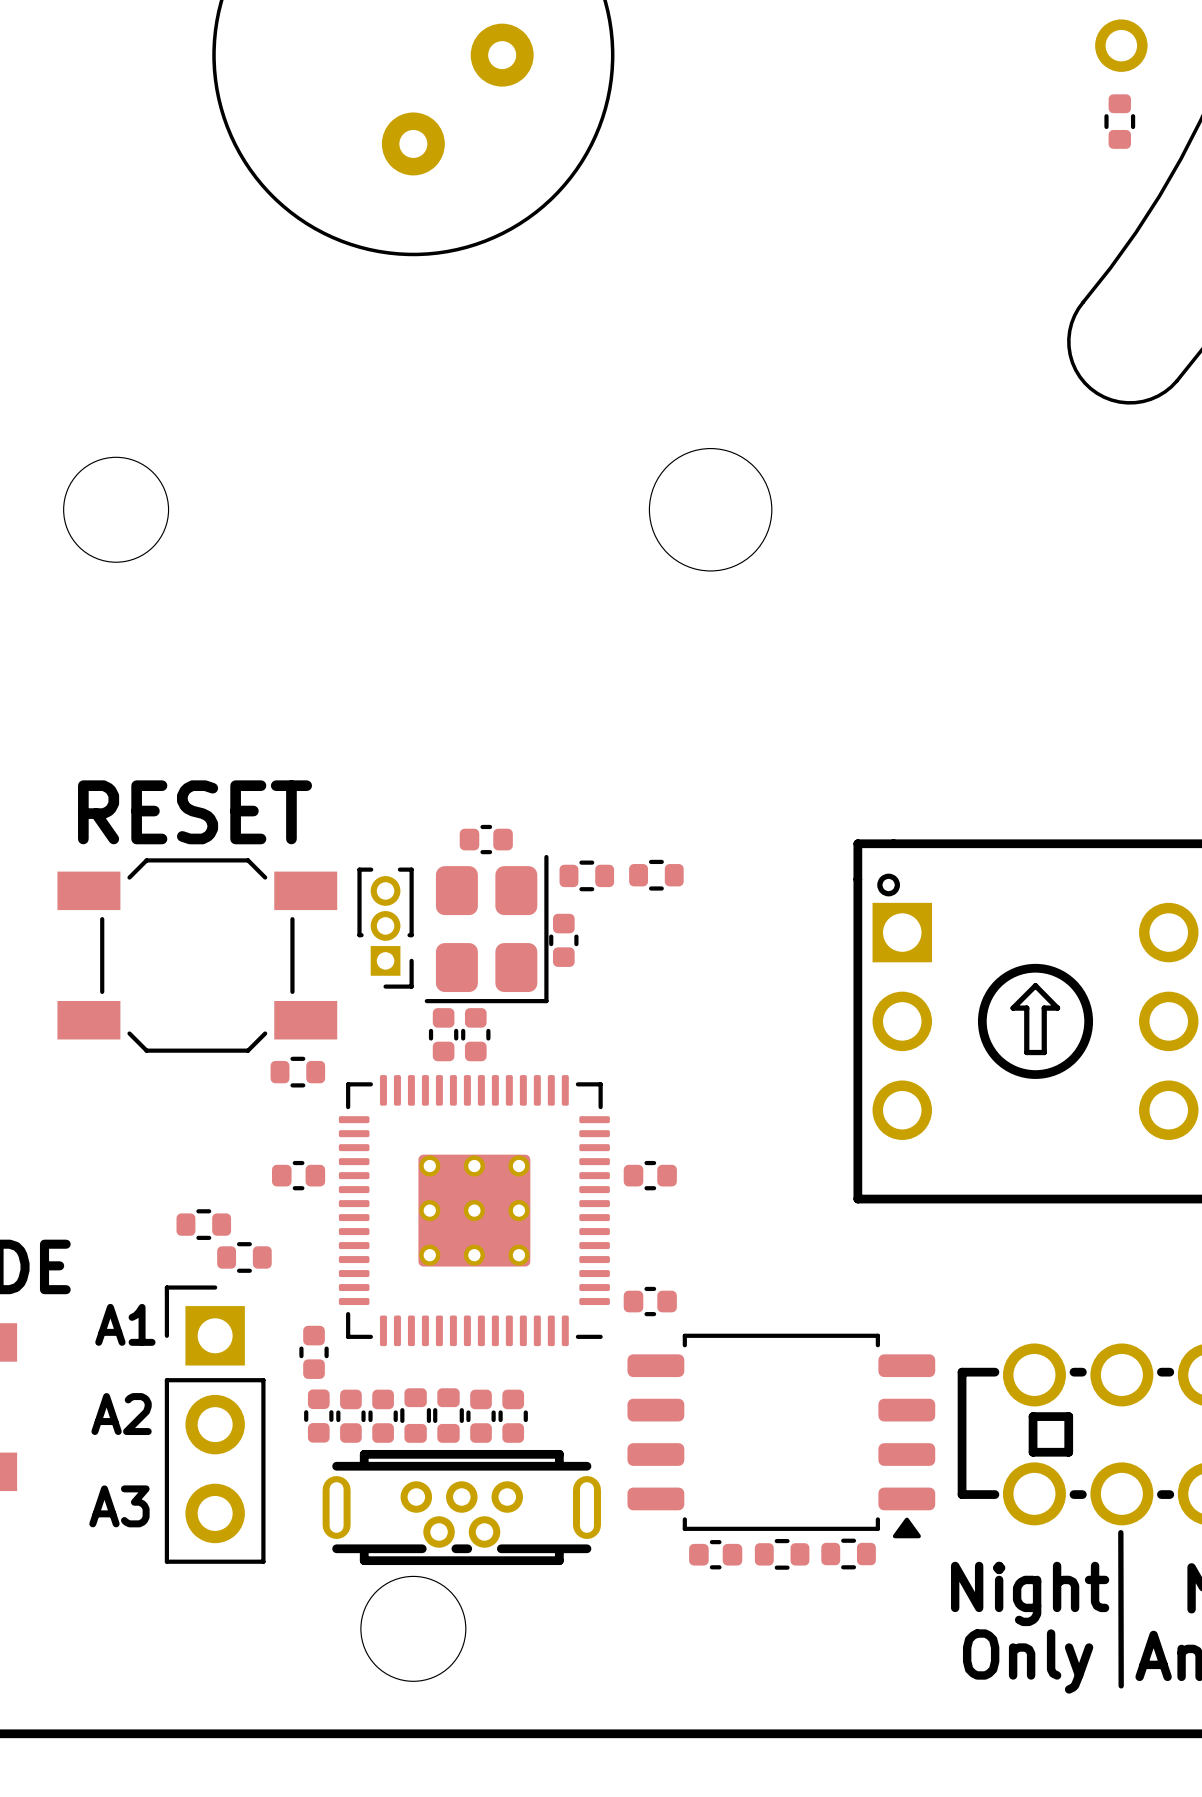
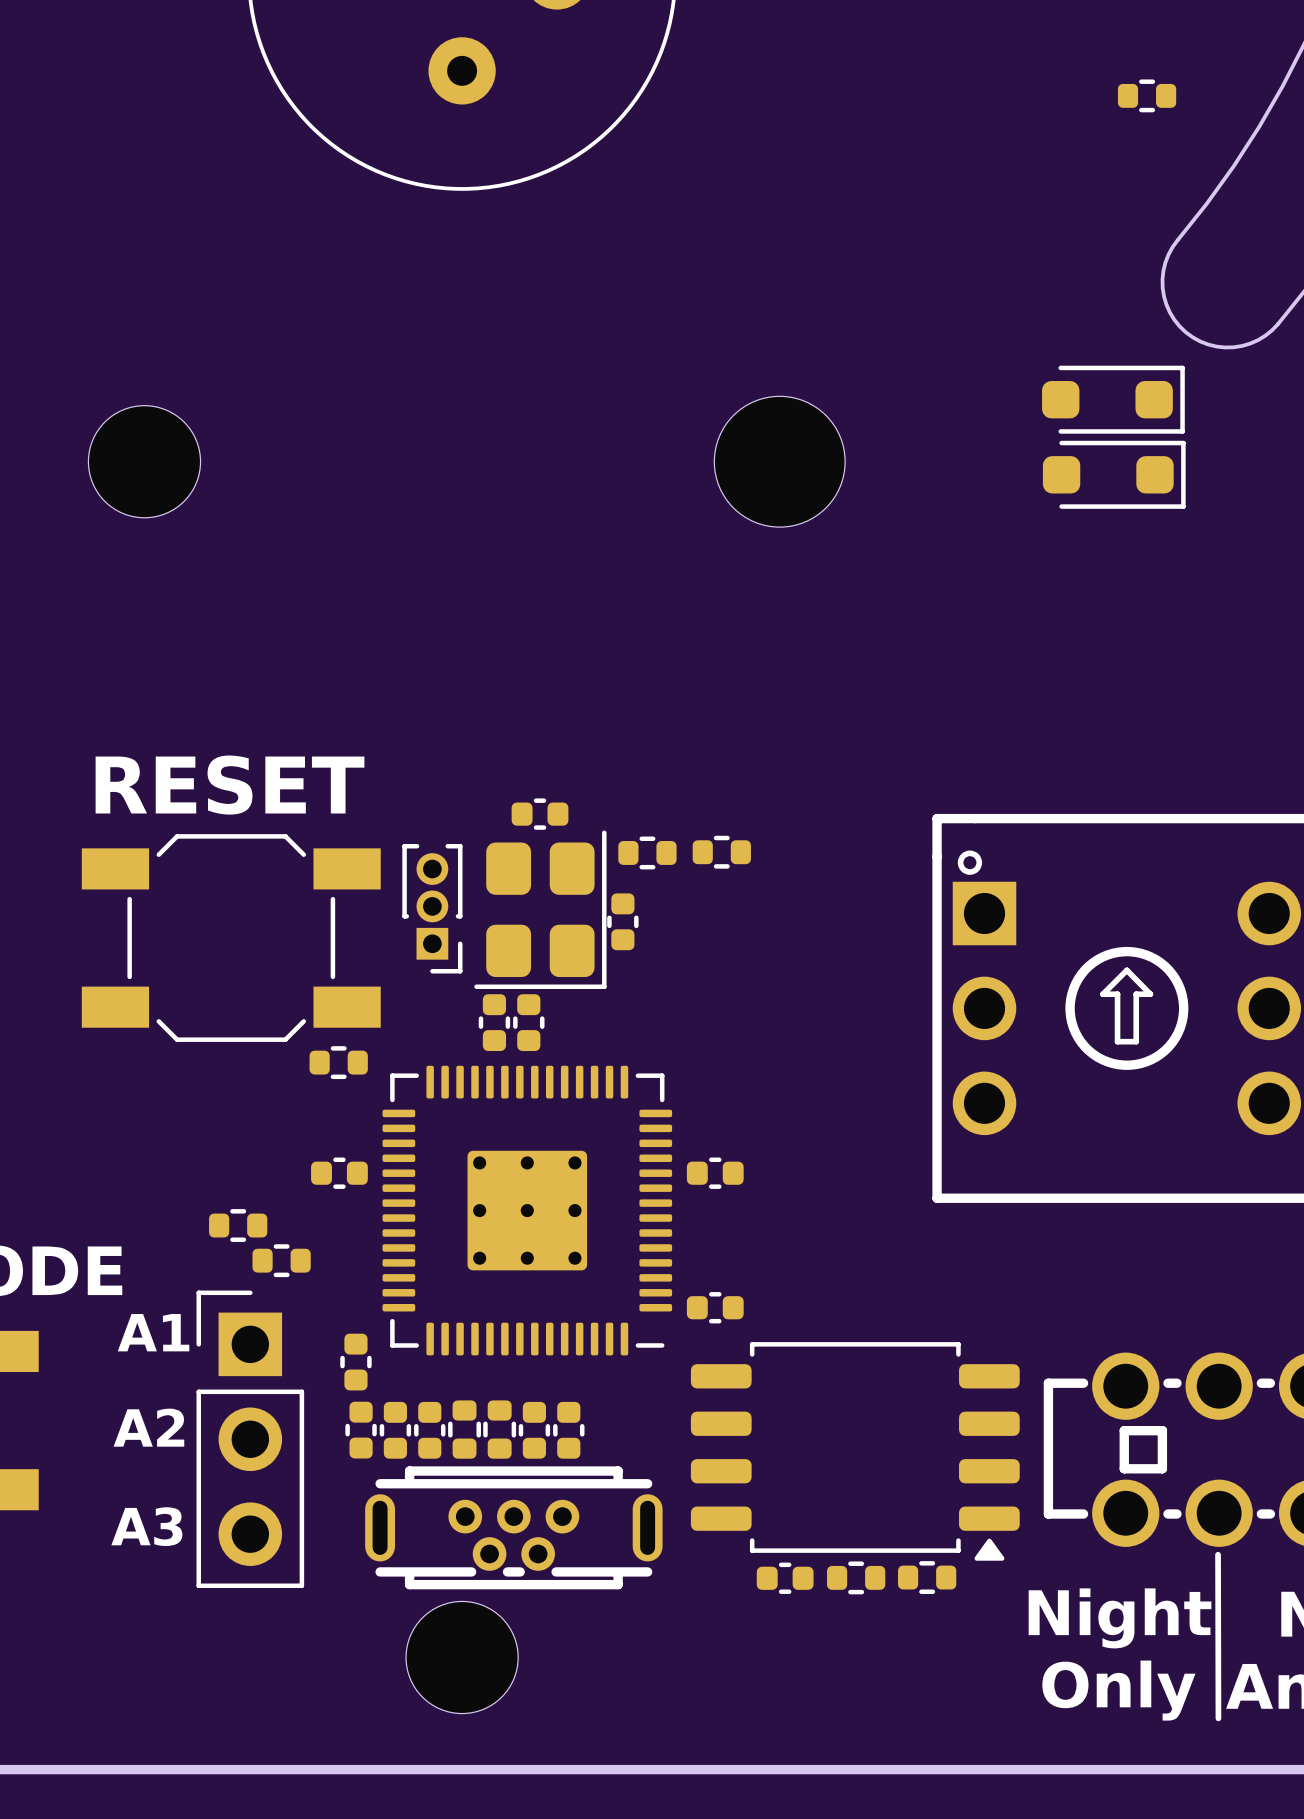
part rotation: 0° (1119, 121) -> 90° clockwise (1147, 95)
part position: (1119, 121) -> (1147, 95)
part: none -> (1113, 399)
part: none -> (1114, 474)

